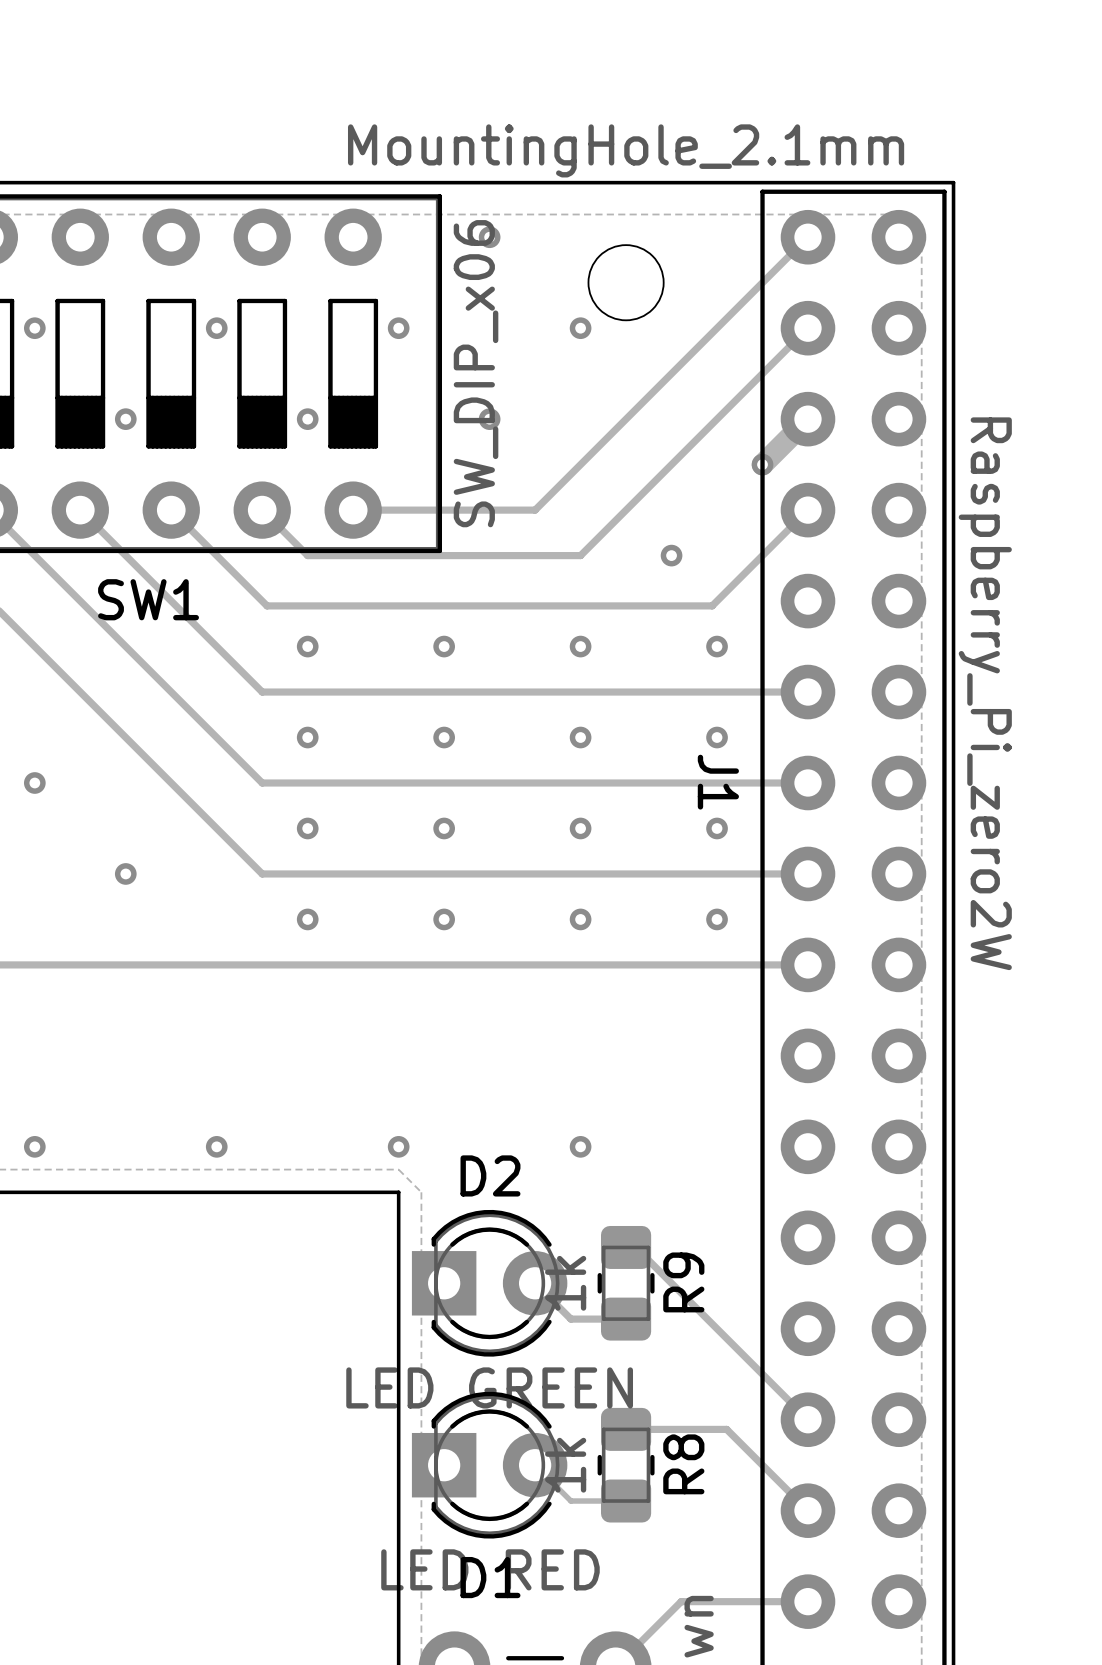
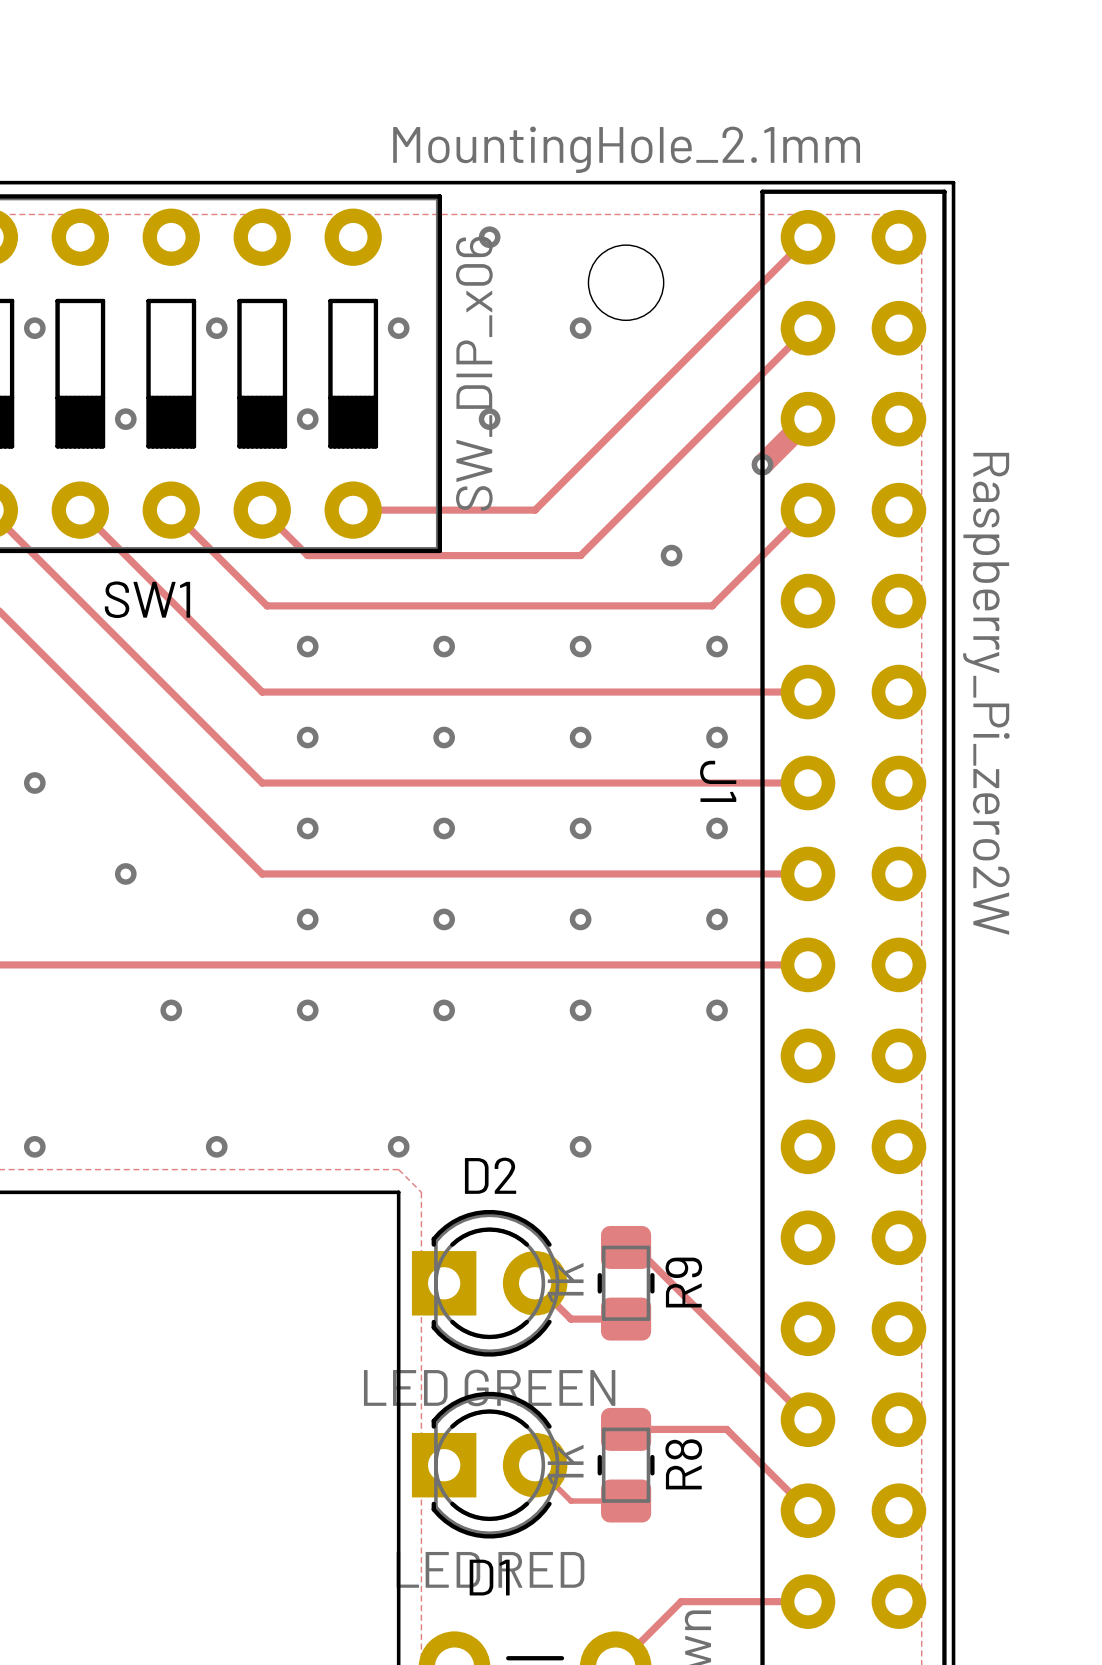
via: none -> (171, 1010)
via: none -> (307, 1010)
via: none -> (444, 1010)
via: none -> (580, 1010)
via: none -> (717, 1010)

